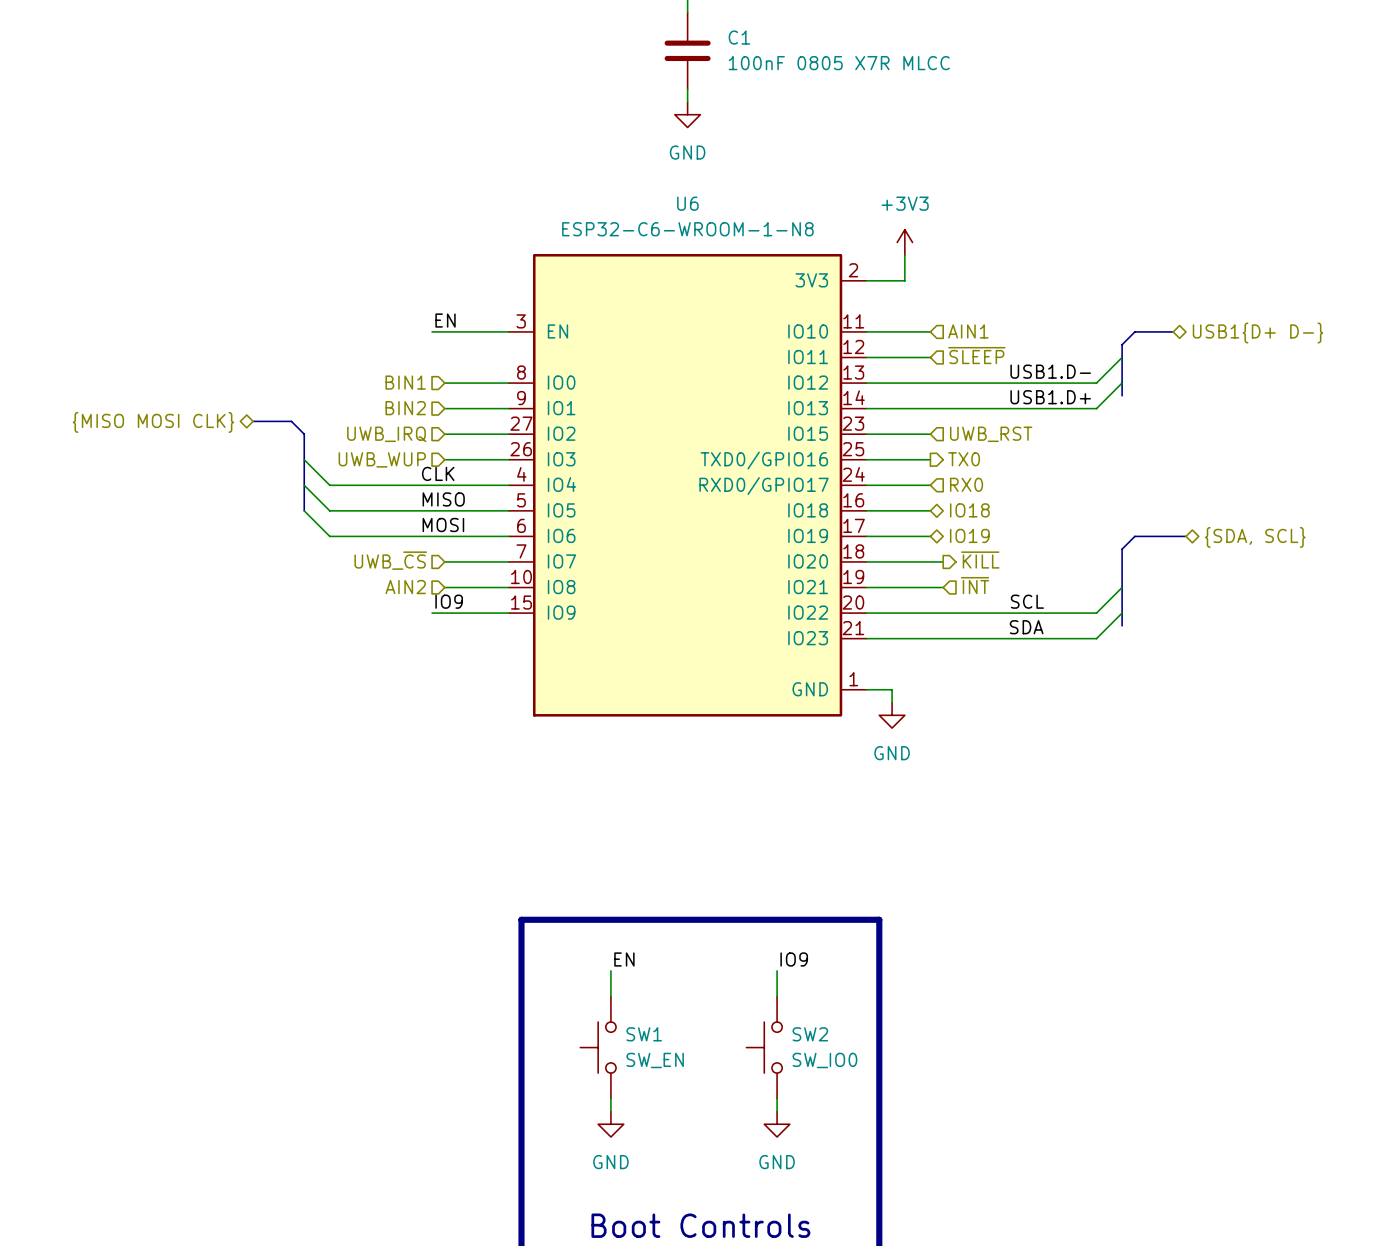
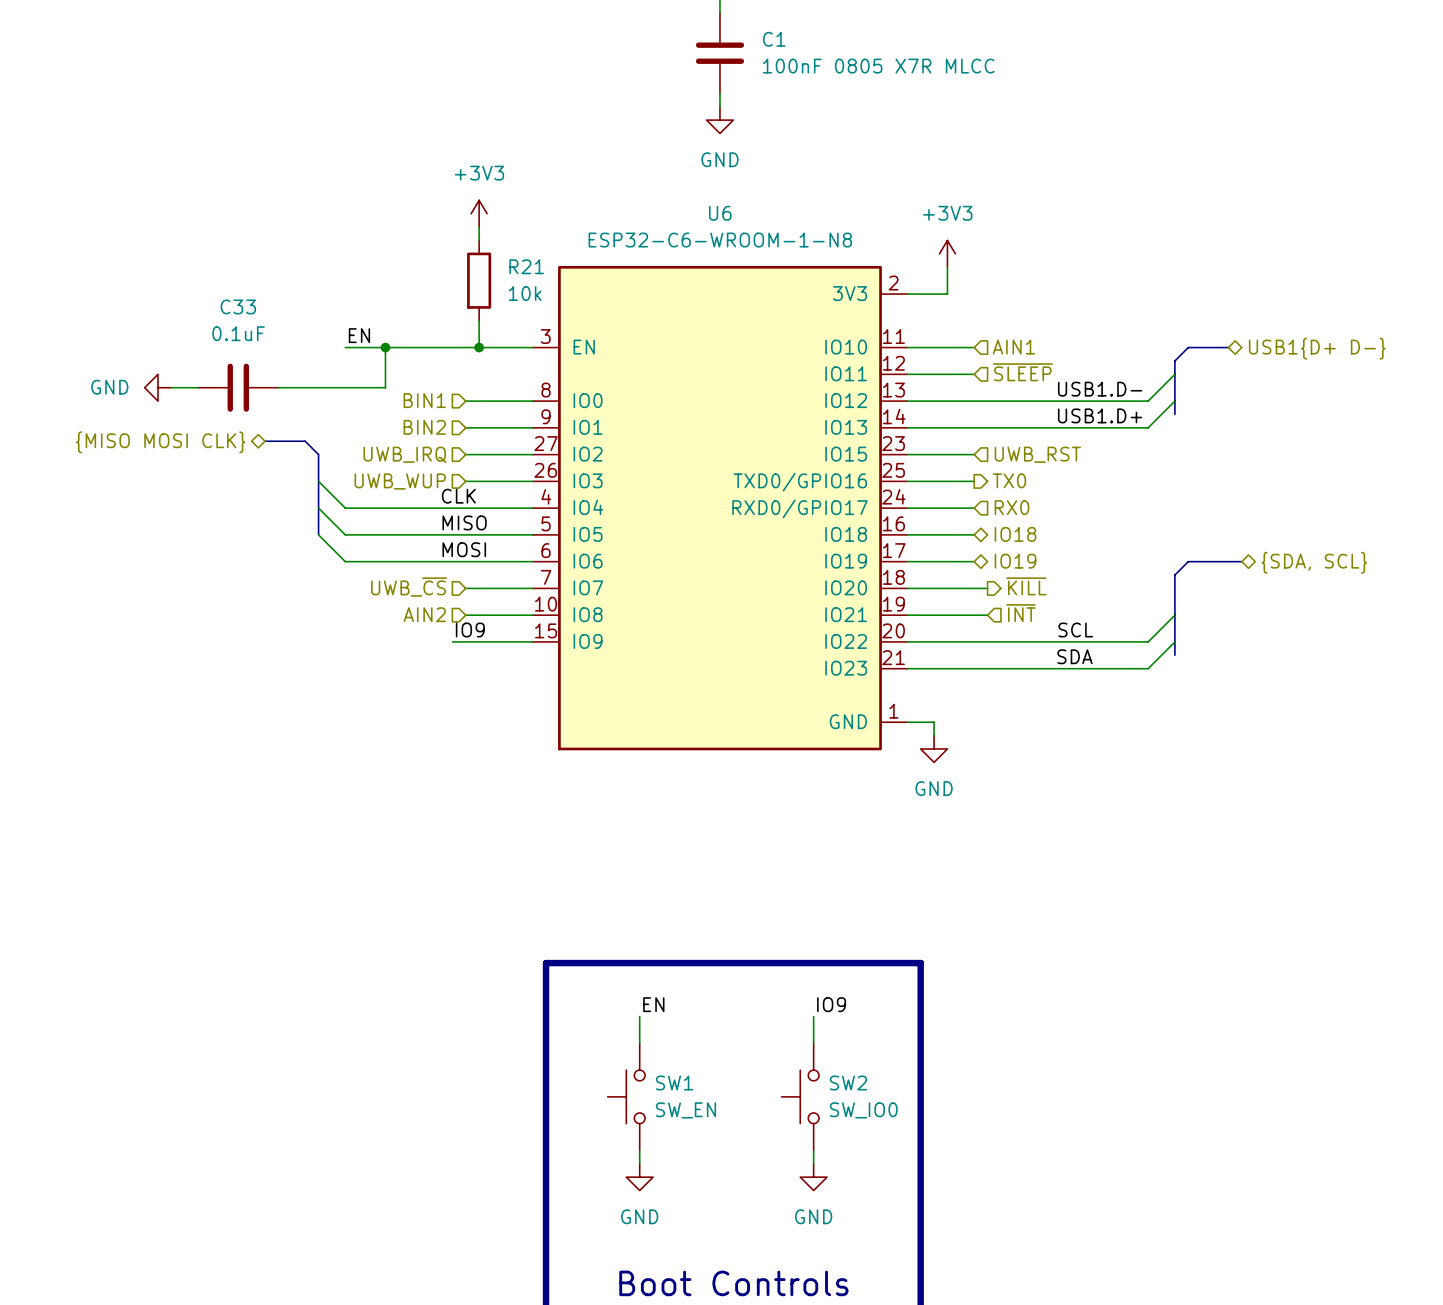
power symbol: none -> +3V3 (479, 213)
wire: none -> (479, 227) (479, 240)
R21: none -> 10k (479, 280)
wire: none -> (479, 320) (479, 347)
label position: EN (445, 320) -> EN (359, 335)
wire: none -> (345, 347) (452, 347)
wire: none -> (385, 347) (385, 387) (278, 387)
junction: none -> (385, 347)
junction: none -> (479, 347)
power symbol: none -> GND (158, 387)
wire: none -> (171, 387) (198, 387)
C33: none -> 0.1uF (238, 387)

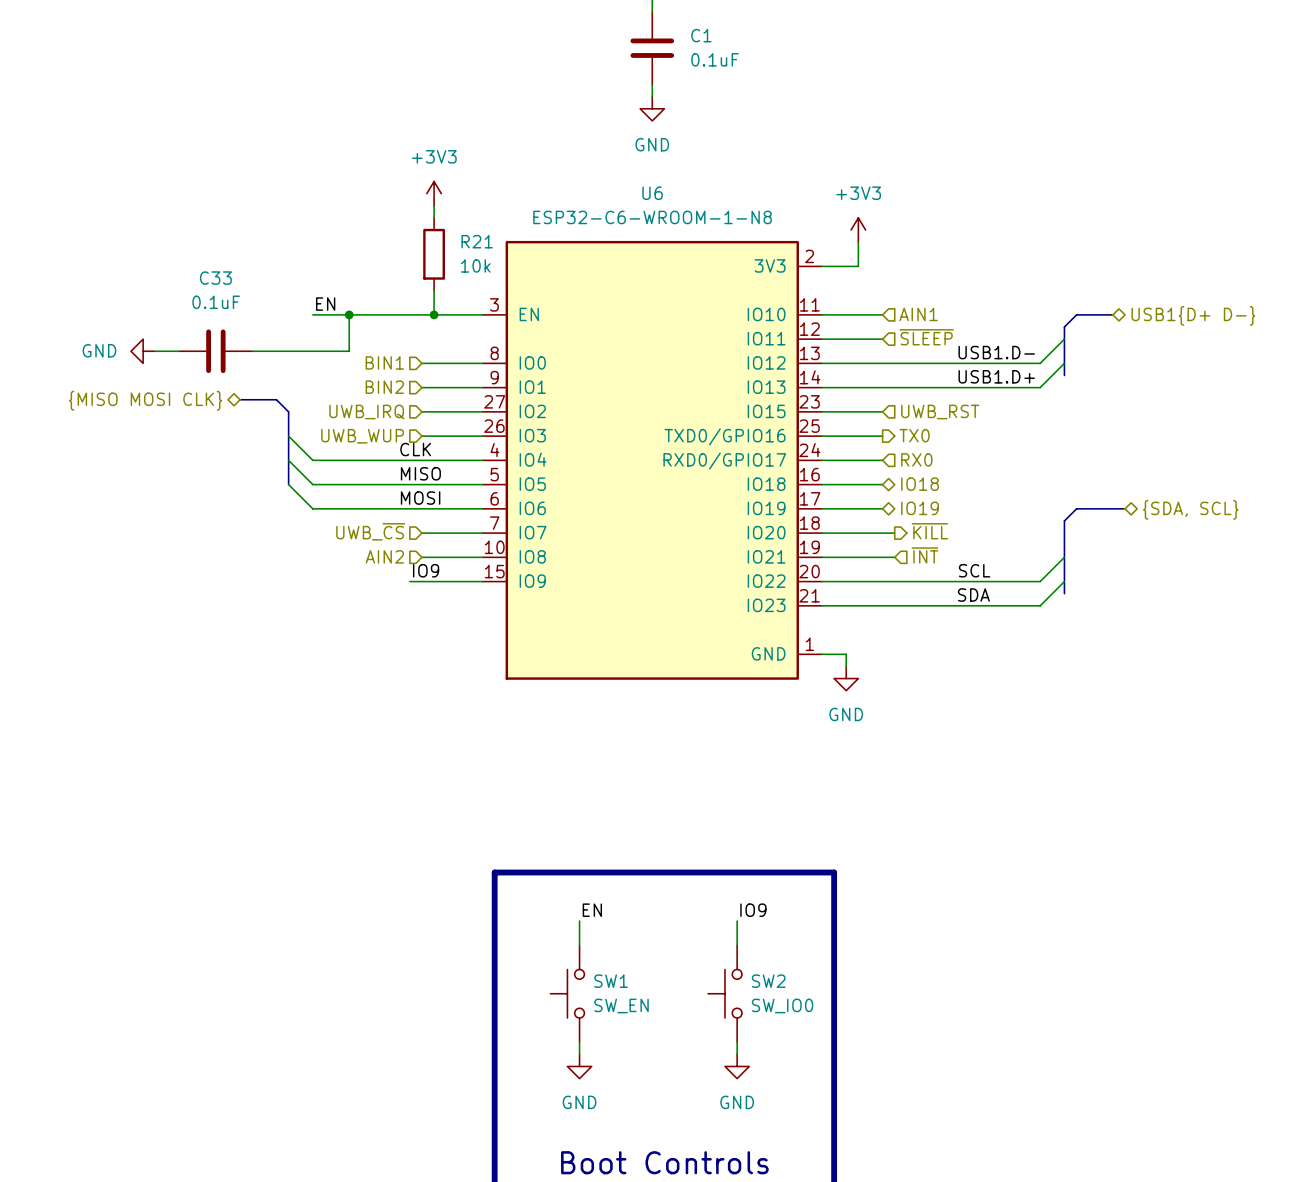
C1 value: 100nF 0805 X7R MLCC (878, 66) -> 0.1uF (715, 59)

